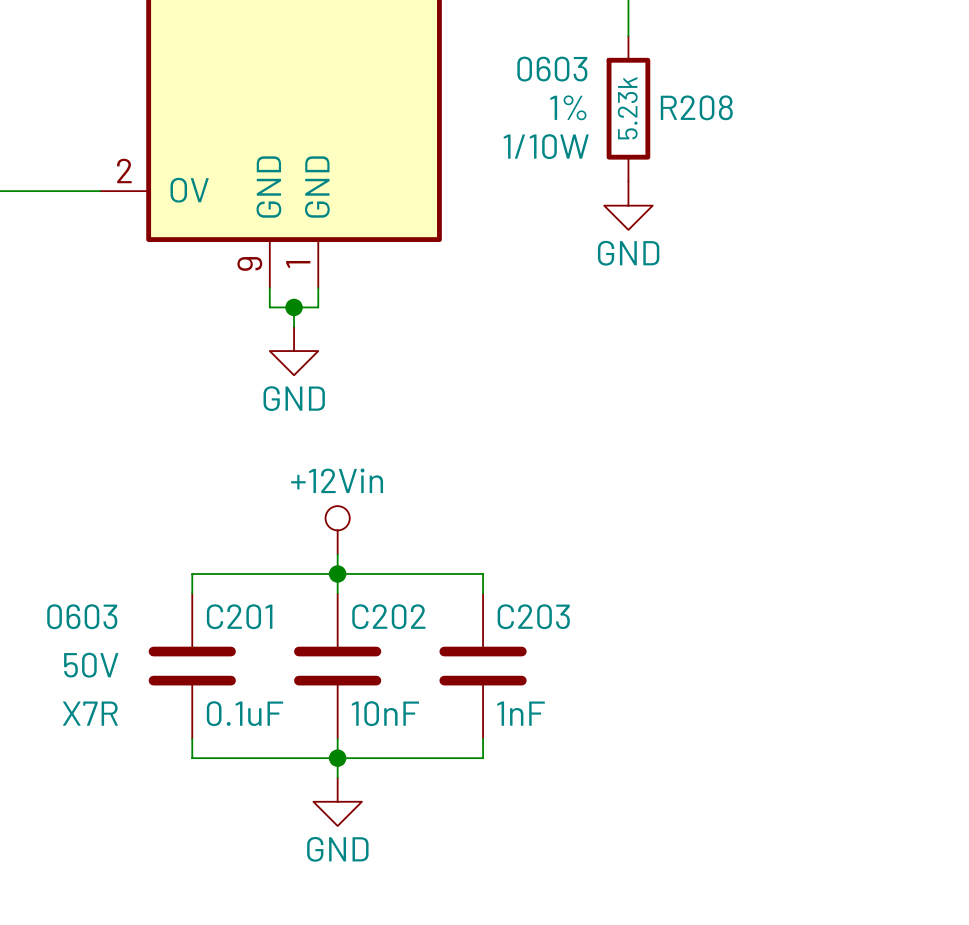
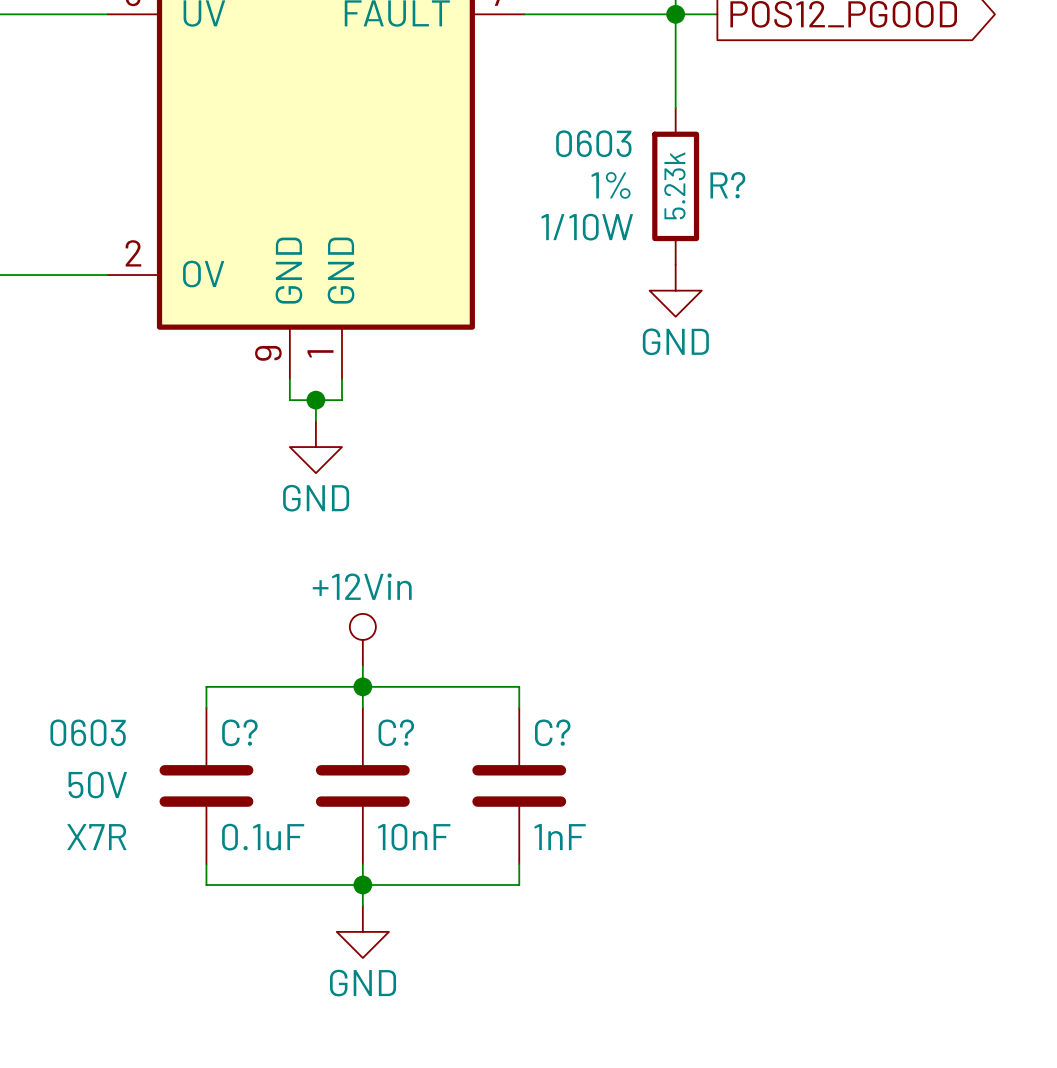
R208 name: R208 (696, 107) -> R? (727, 185)
C201 name: C201 (239, 616) -> C? (239, 732)
C202 name: C202 (388, 616) -> C? (396, 732)
C203 name: C203 (533, 616) -> C? (552, 732)

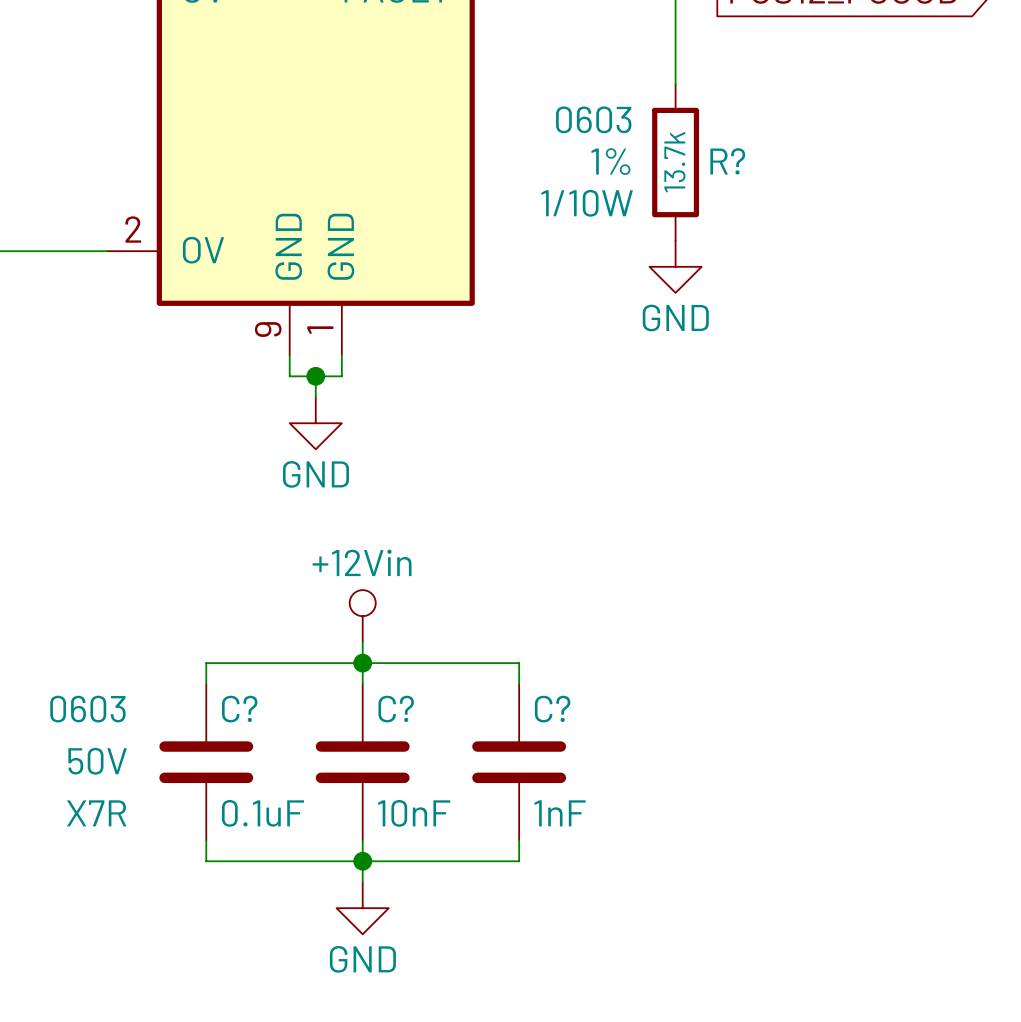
R? value: 5.23k (674, 185) -> 13.7k (674, 162)

